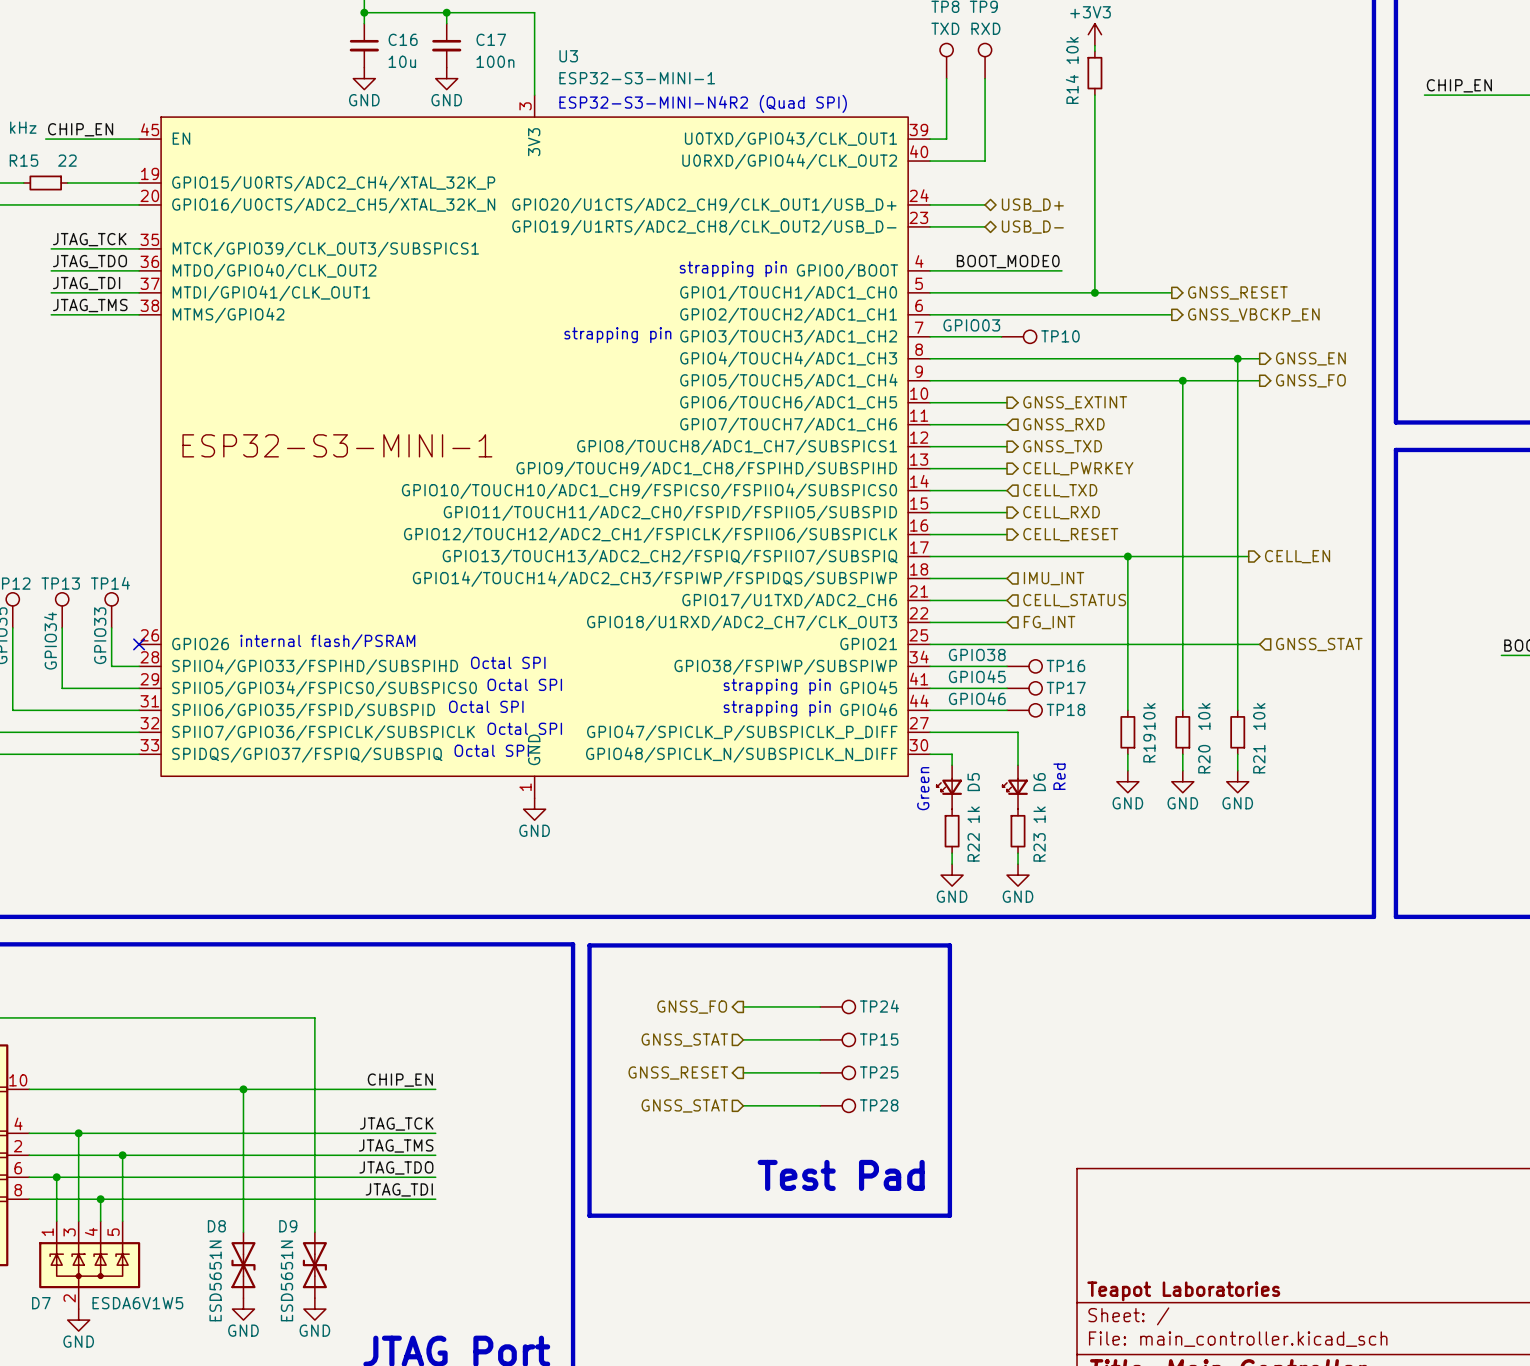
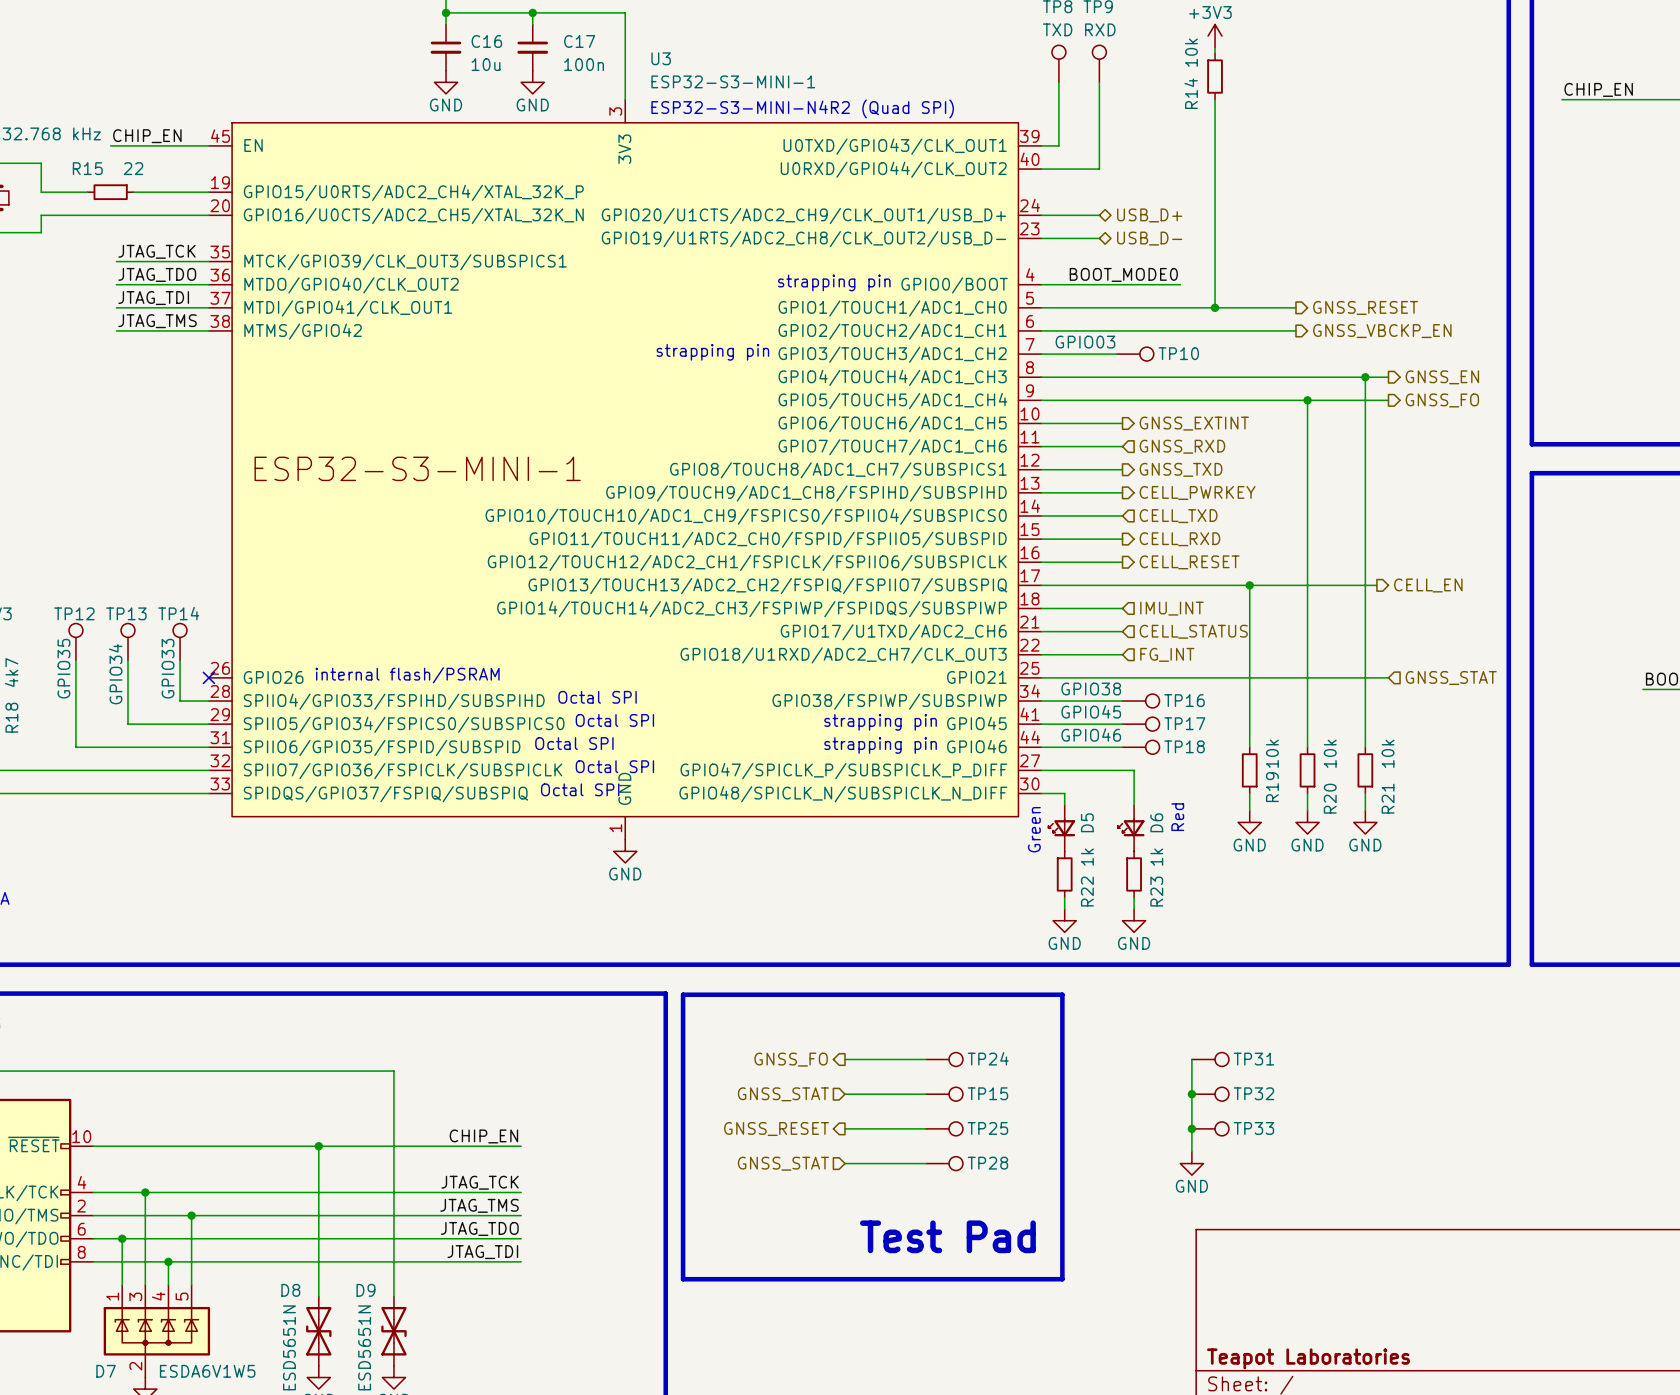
wire: none -> (1191, 1059) (1191, 1152)
TP31: none -> (1210, 1059)
junction: none -> (1191, 1094)
TP32: none -> (1210, 1094)
junction: none -> (1191, 1128)
TP33: none -> (1210, 1128)
power symbol: none -> GND (1191, 1163)

